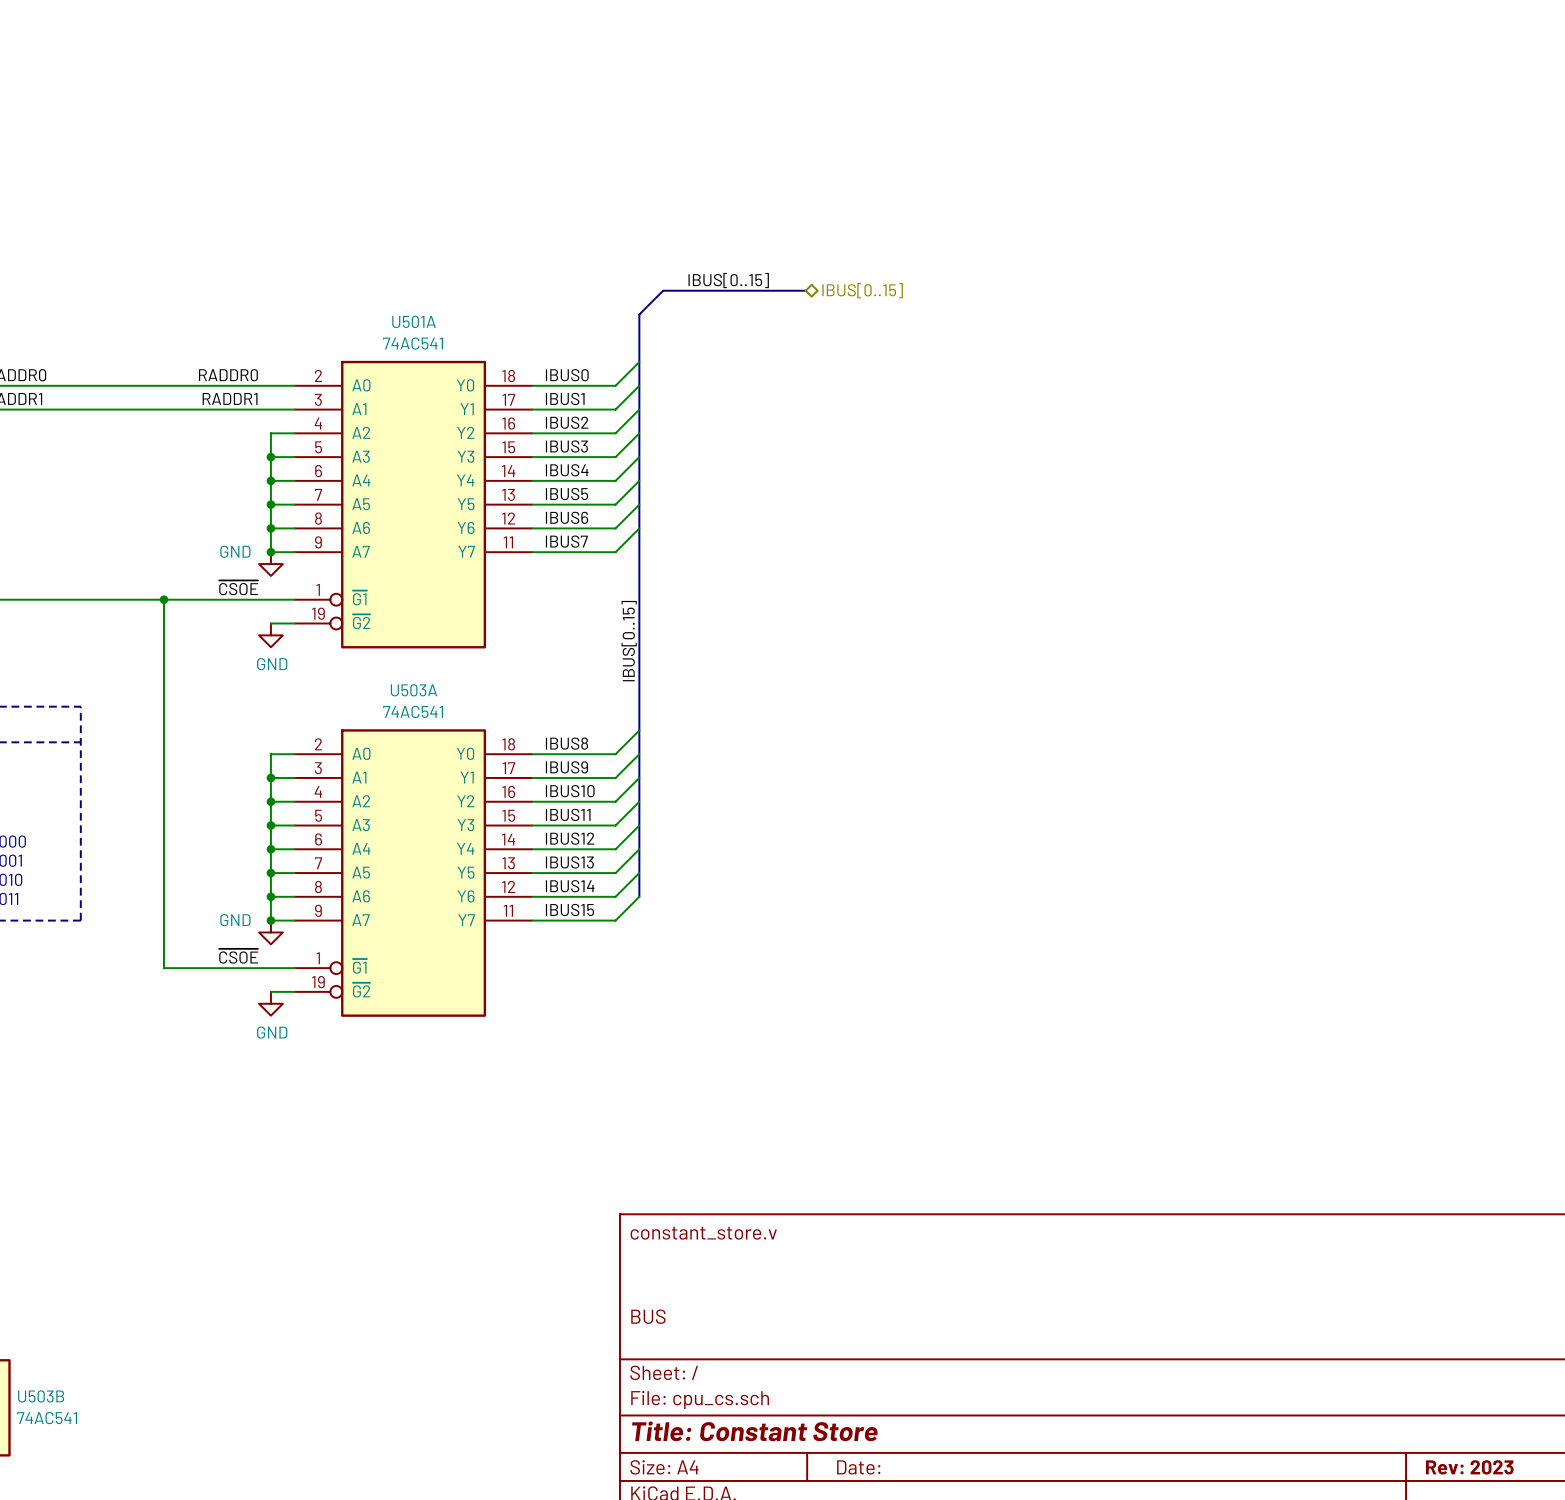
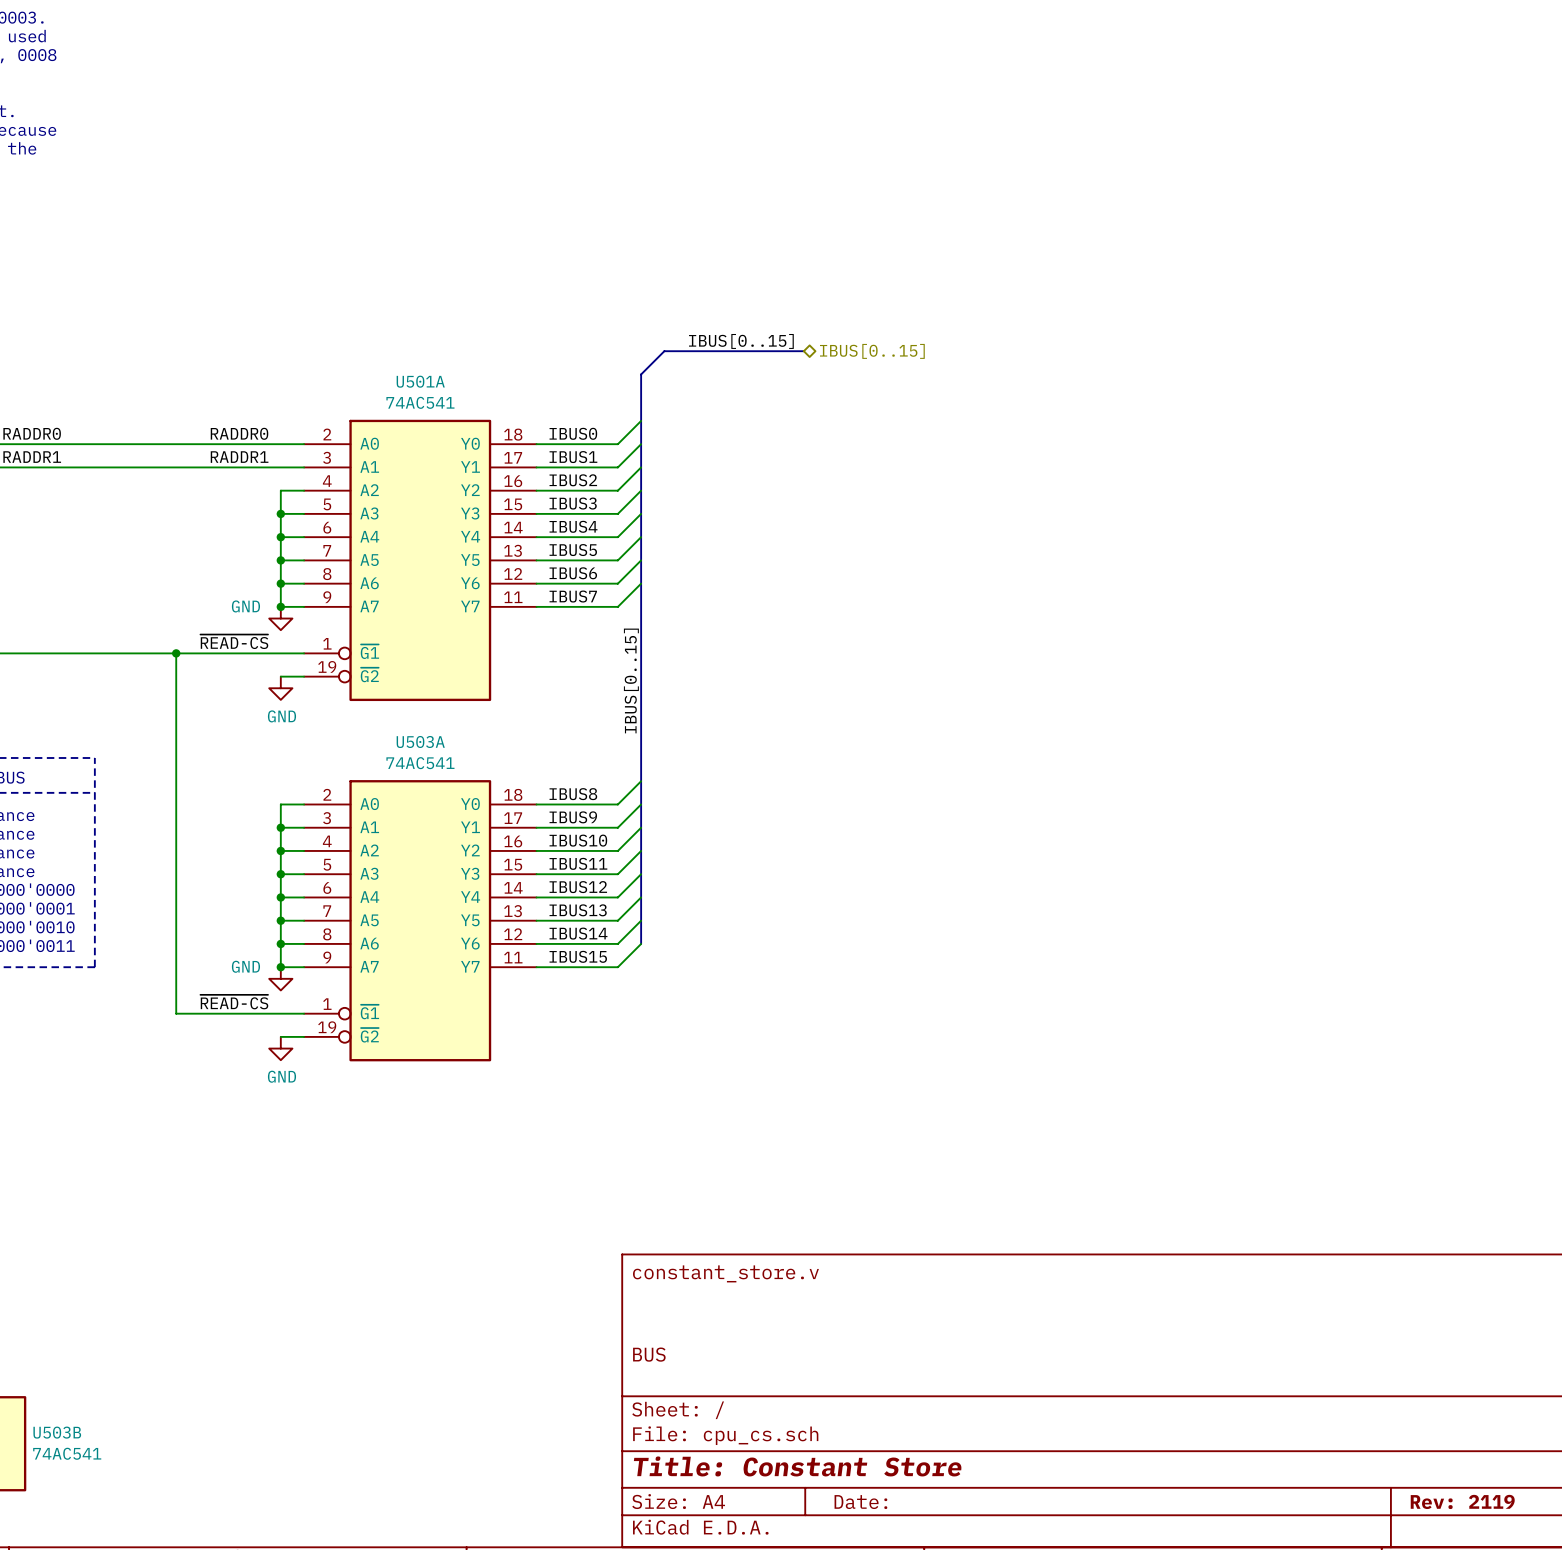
label: ~{CSOE} (238, 587) -> ~{READ-CS} (234, 641)
label: ~{CSOE} (238, 956) -> ~{READ-CS} (234, 1002)
title block: Rev: 2023 (1469, 1467) -> Rev: 2119 (1462, 1501)

